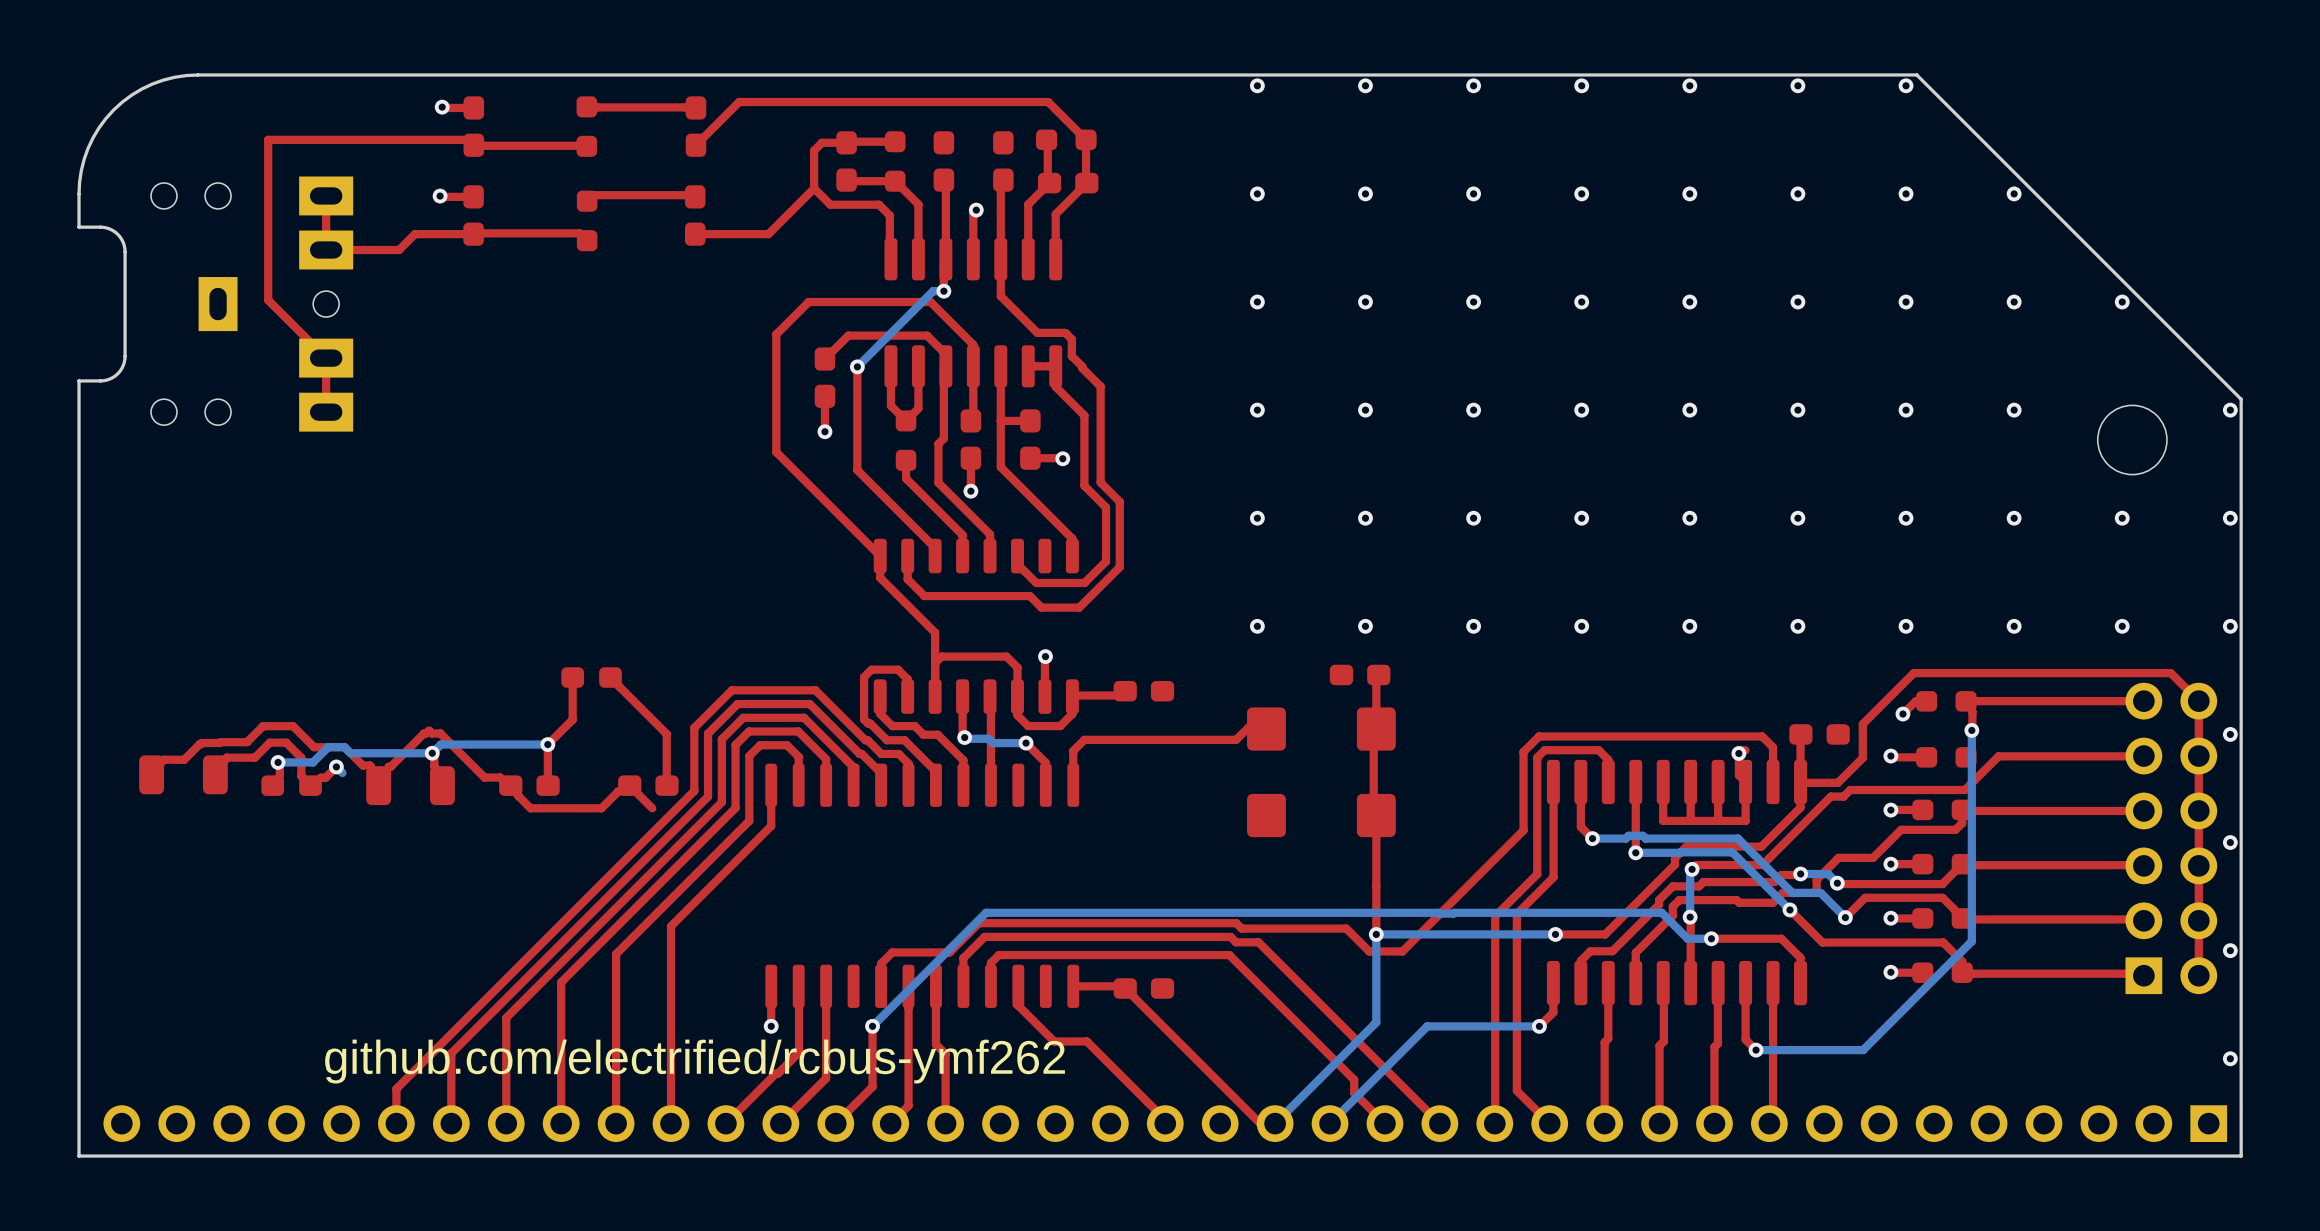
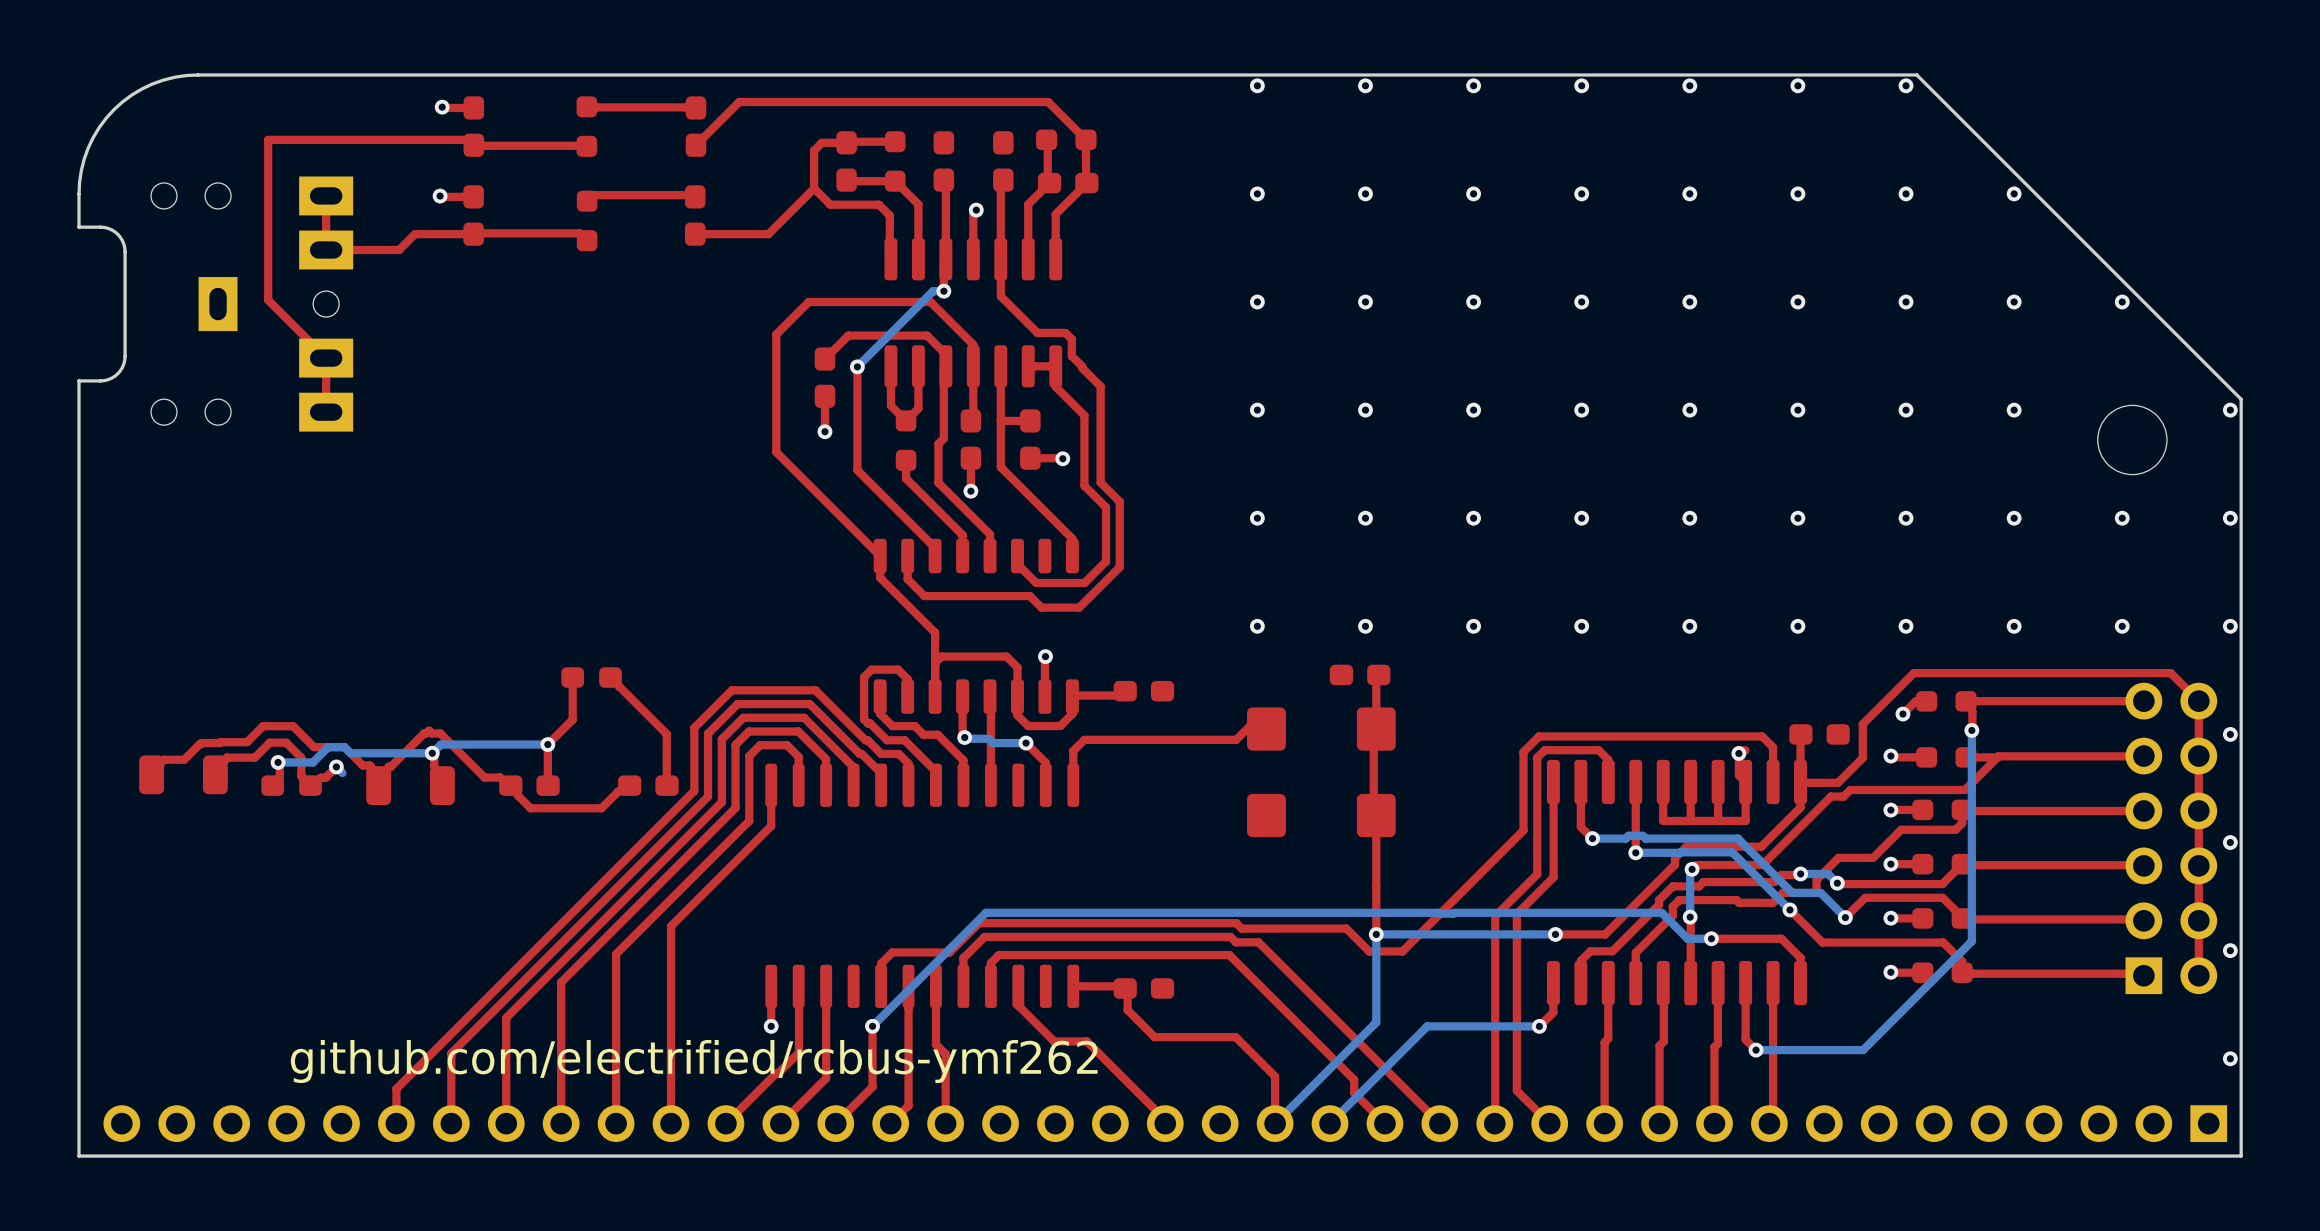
top track: none -> (1997, 757) (1966, 757)
top track: (629, 785) (652, 808) -> none
top track: (1125, 988) (1260, 1123) (1275, 1123) -> (1125, 988) (1127, 988) (1127, 1010) (1154, 1037) (1235, 1037) (1275, 1076) (1275, 1123)

